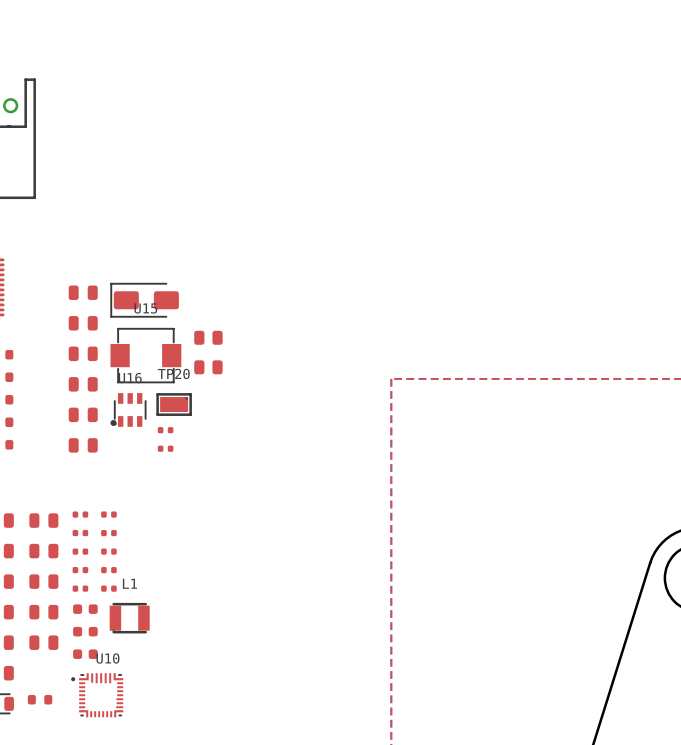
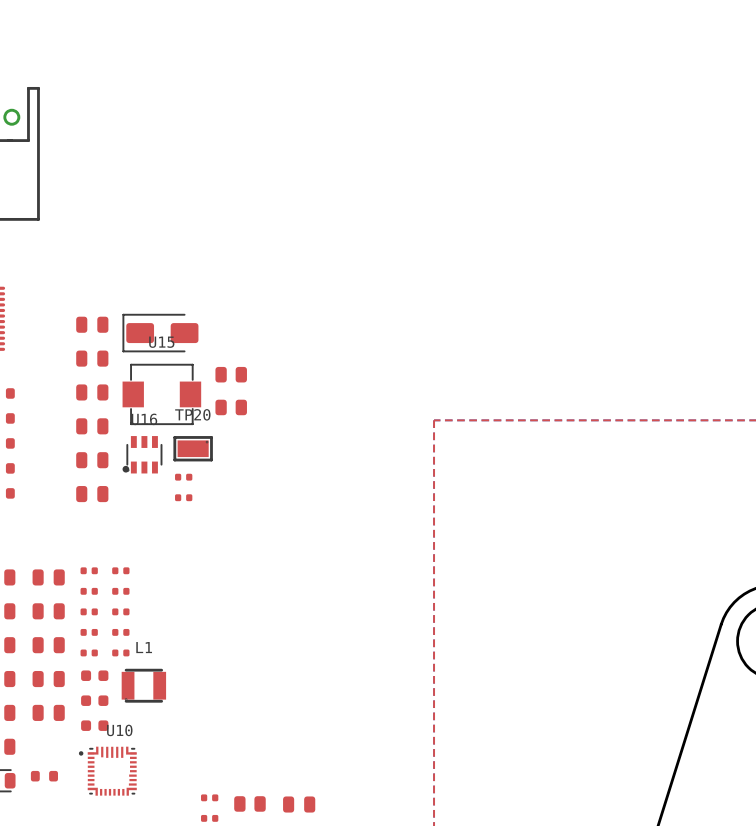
part: none -> (209, 797)
part: none -> (249, 803)
part: none -> (299, 804)
part: none -> (209, 818)

